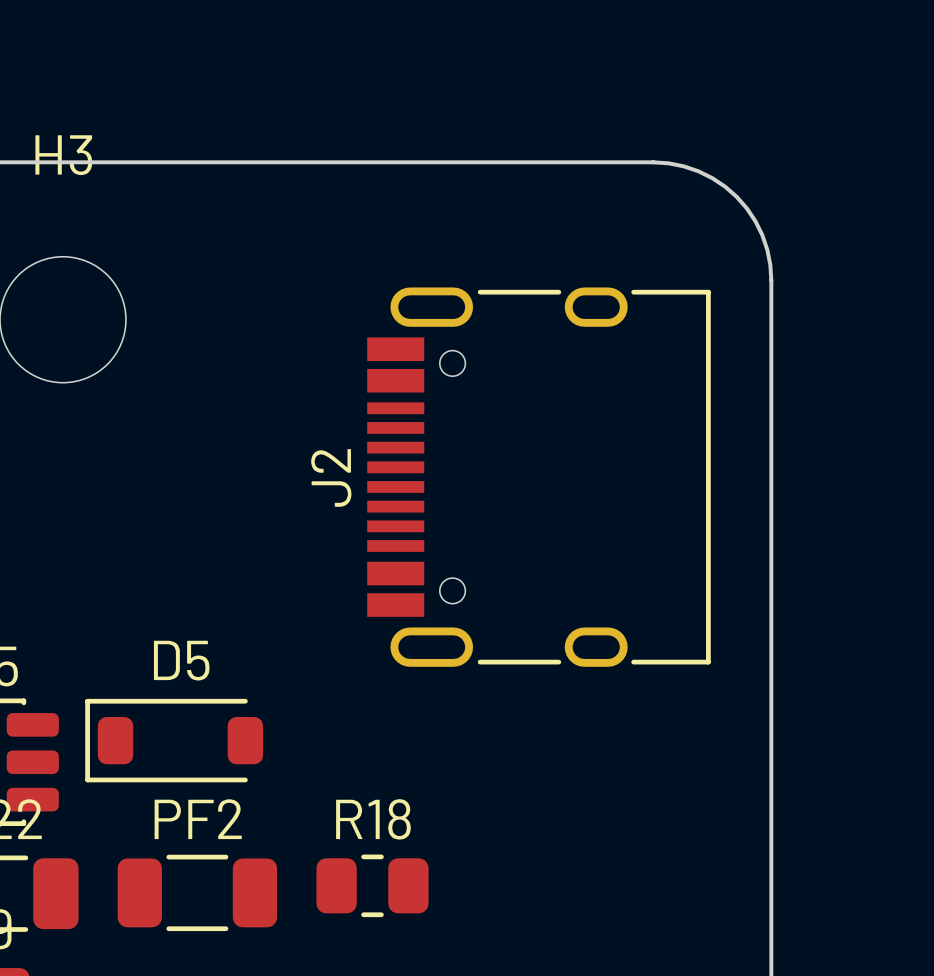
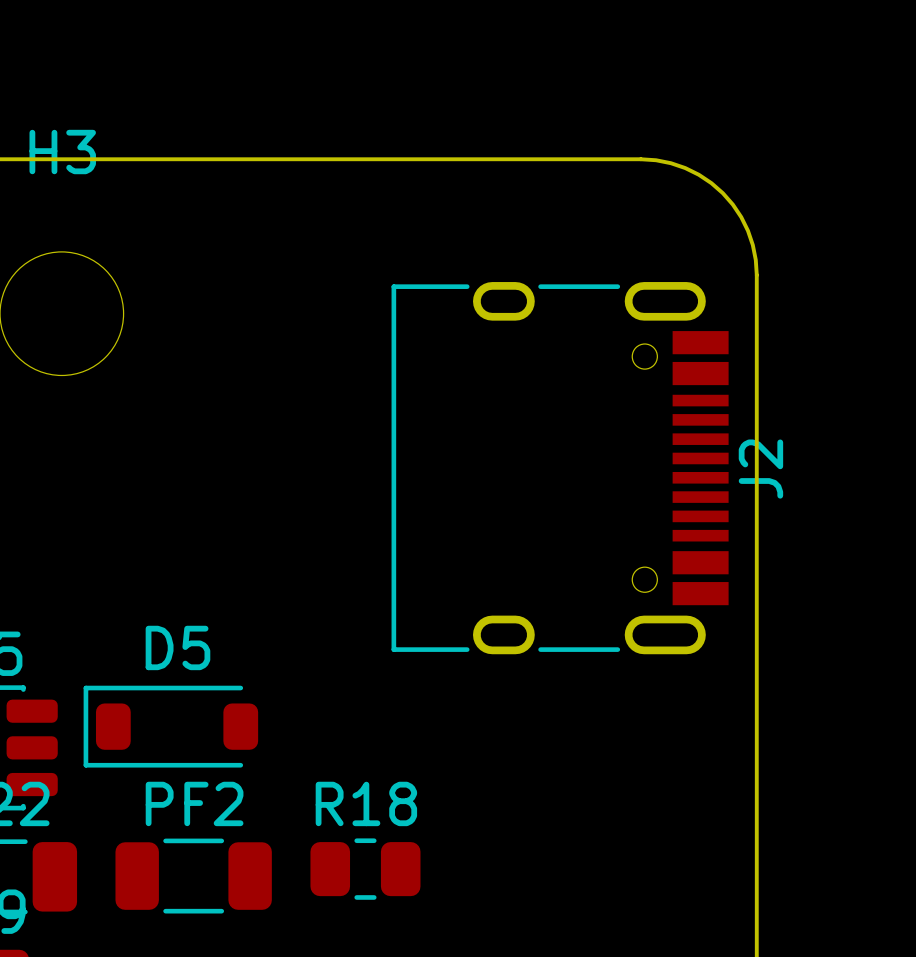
J2 rotation: 0° (538, 477) -> 180° (560, 468)

